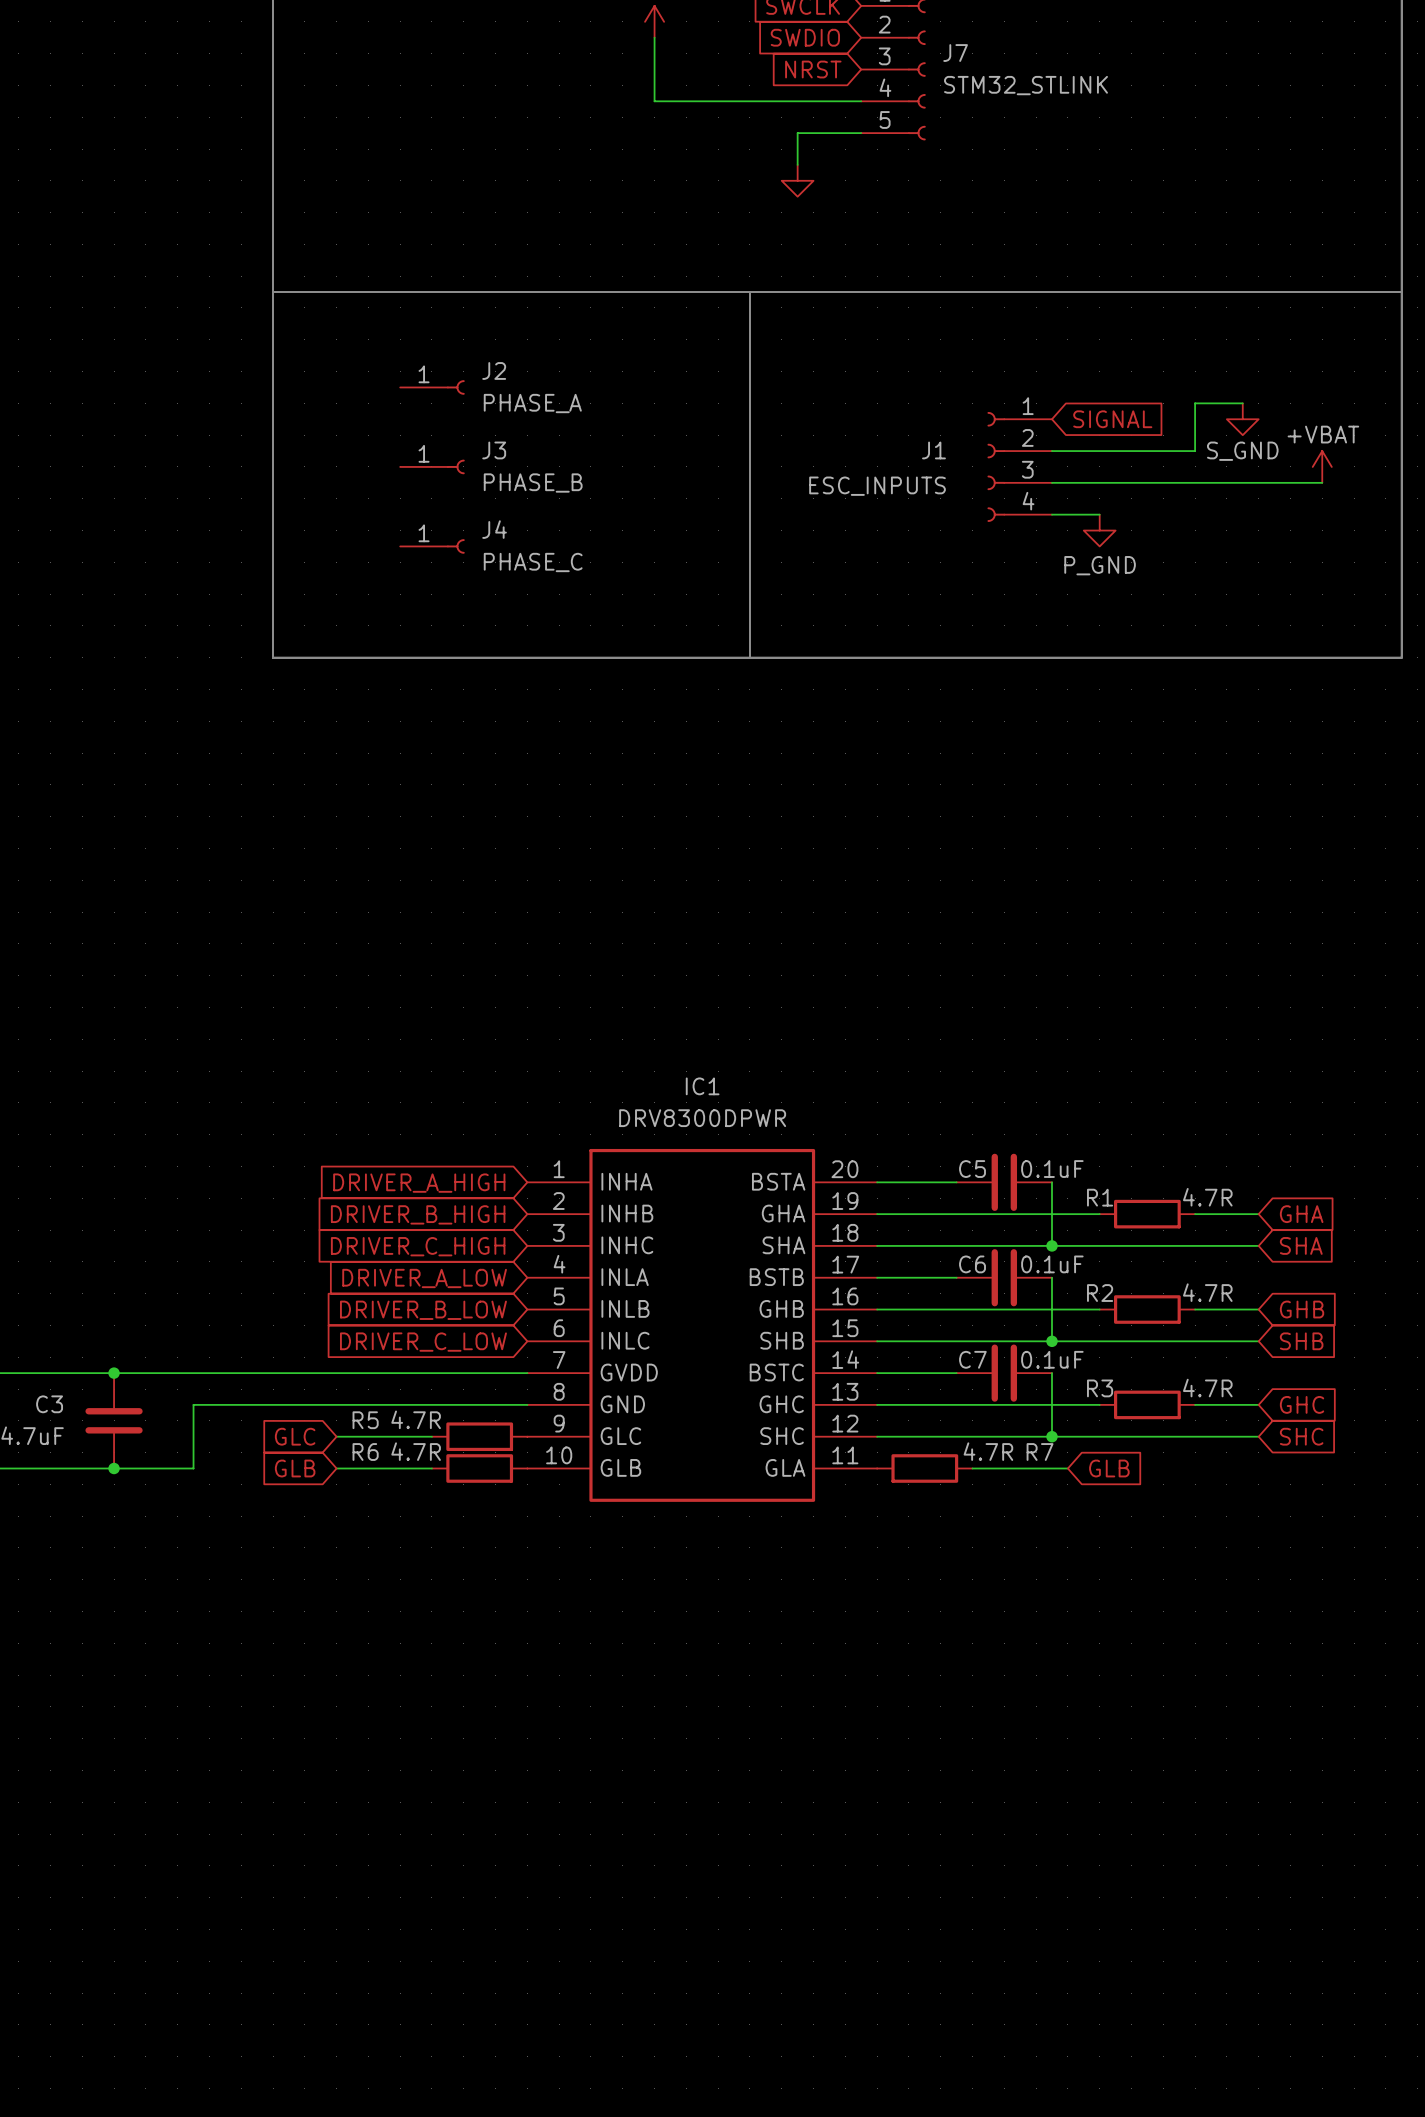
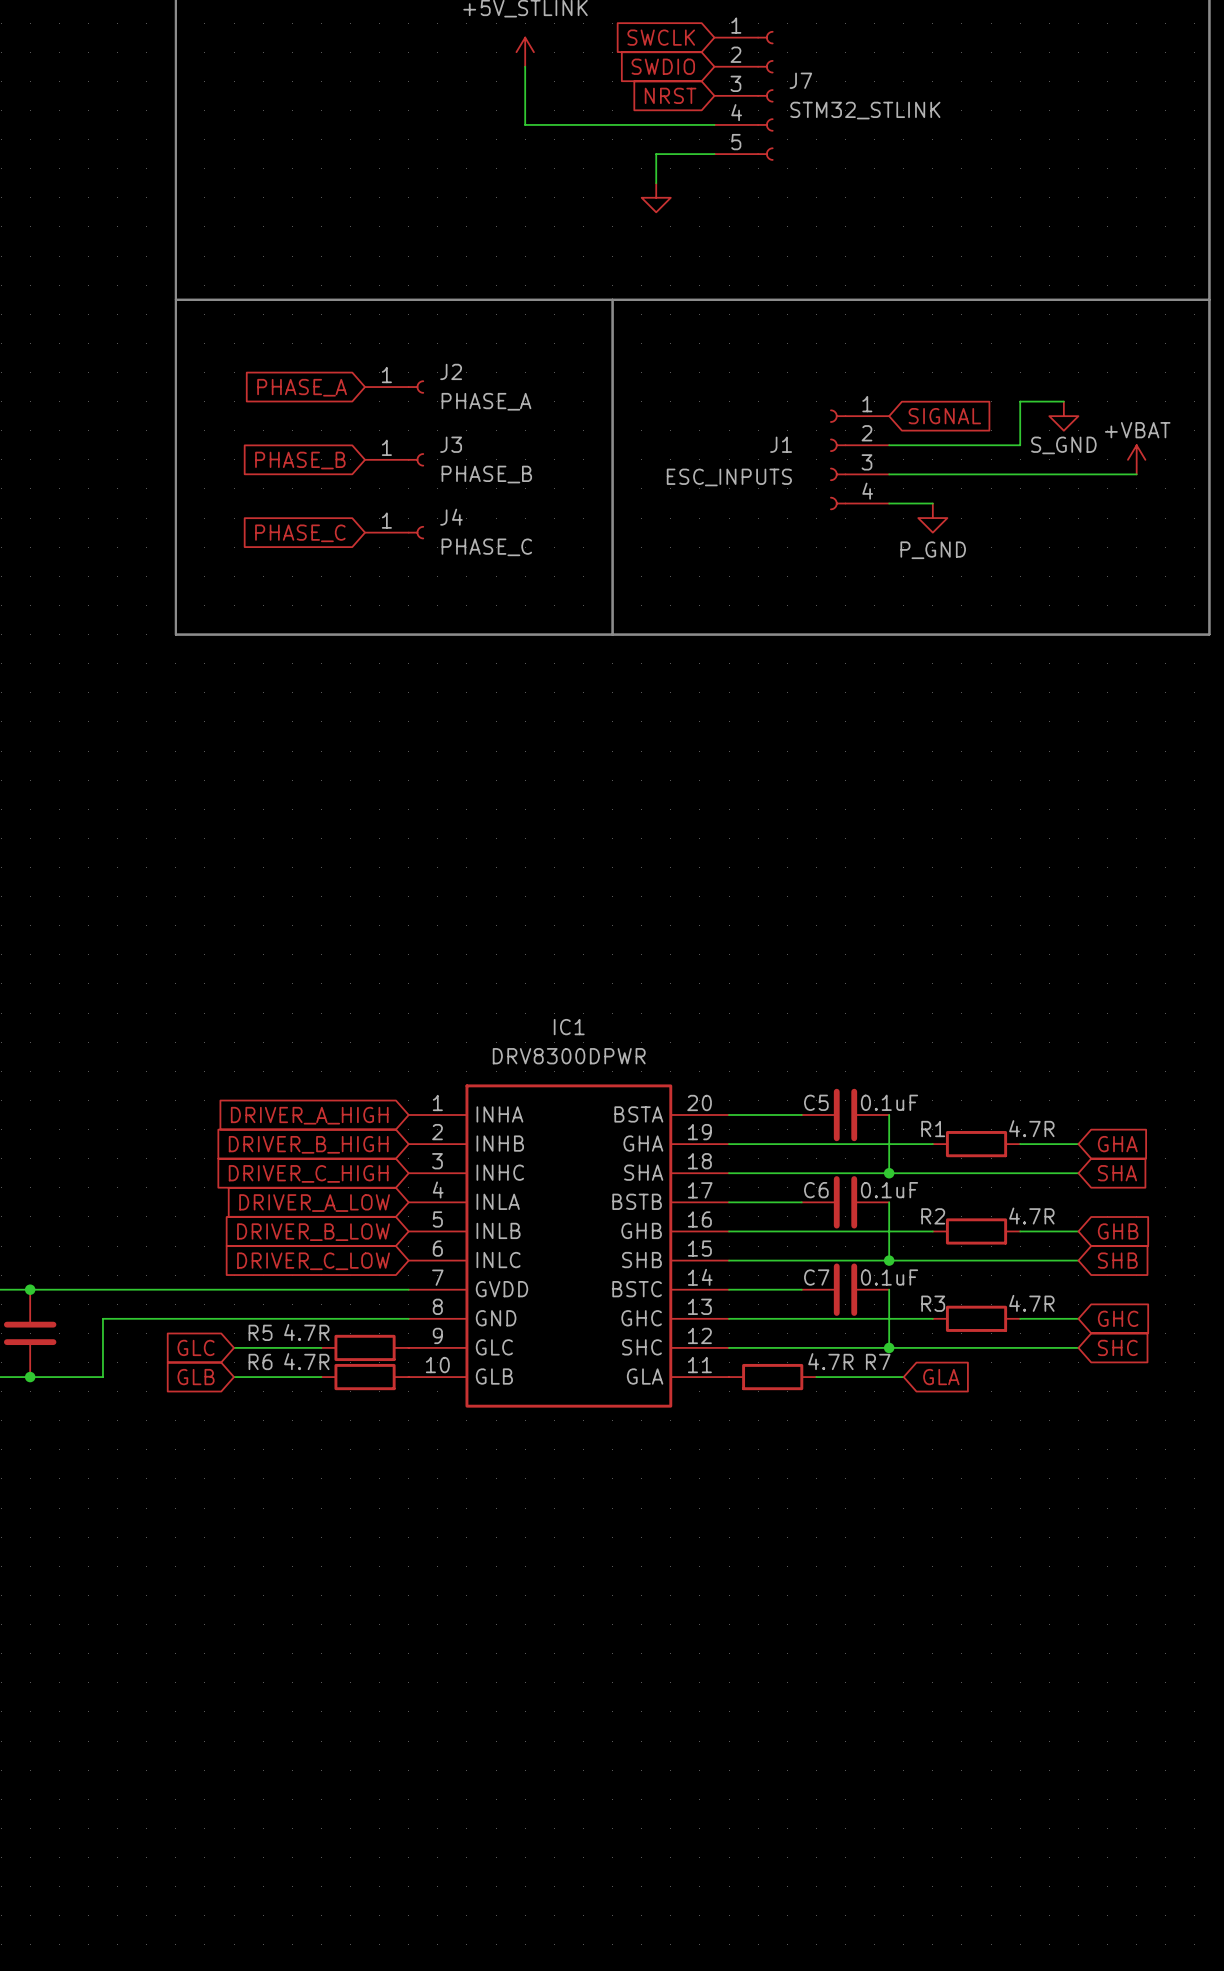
J2 position: (432, 387) -> (394, 387)
global label: none -> PHASE_A (302, 387)
J3 position: (432, 466) -> (394, 459)
global label: none -> PHASE_B (300, 460)
J4 position: (432, 546) -> (394, 532)
global label: none -> PHASE_C (300, 533)
global label: GLB (1109, 1468) -> GLA (941, 1377)

